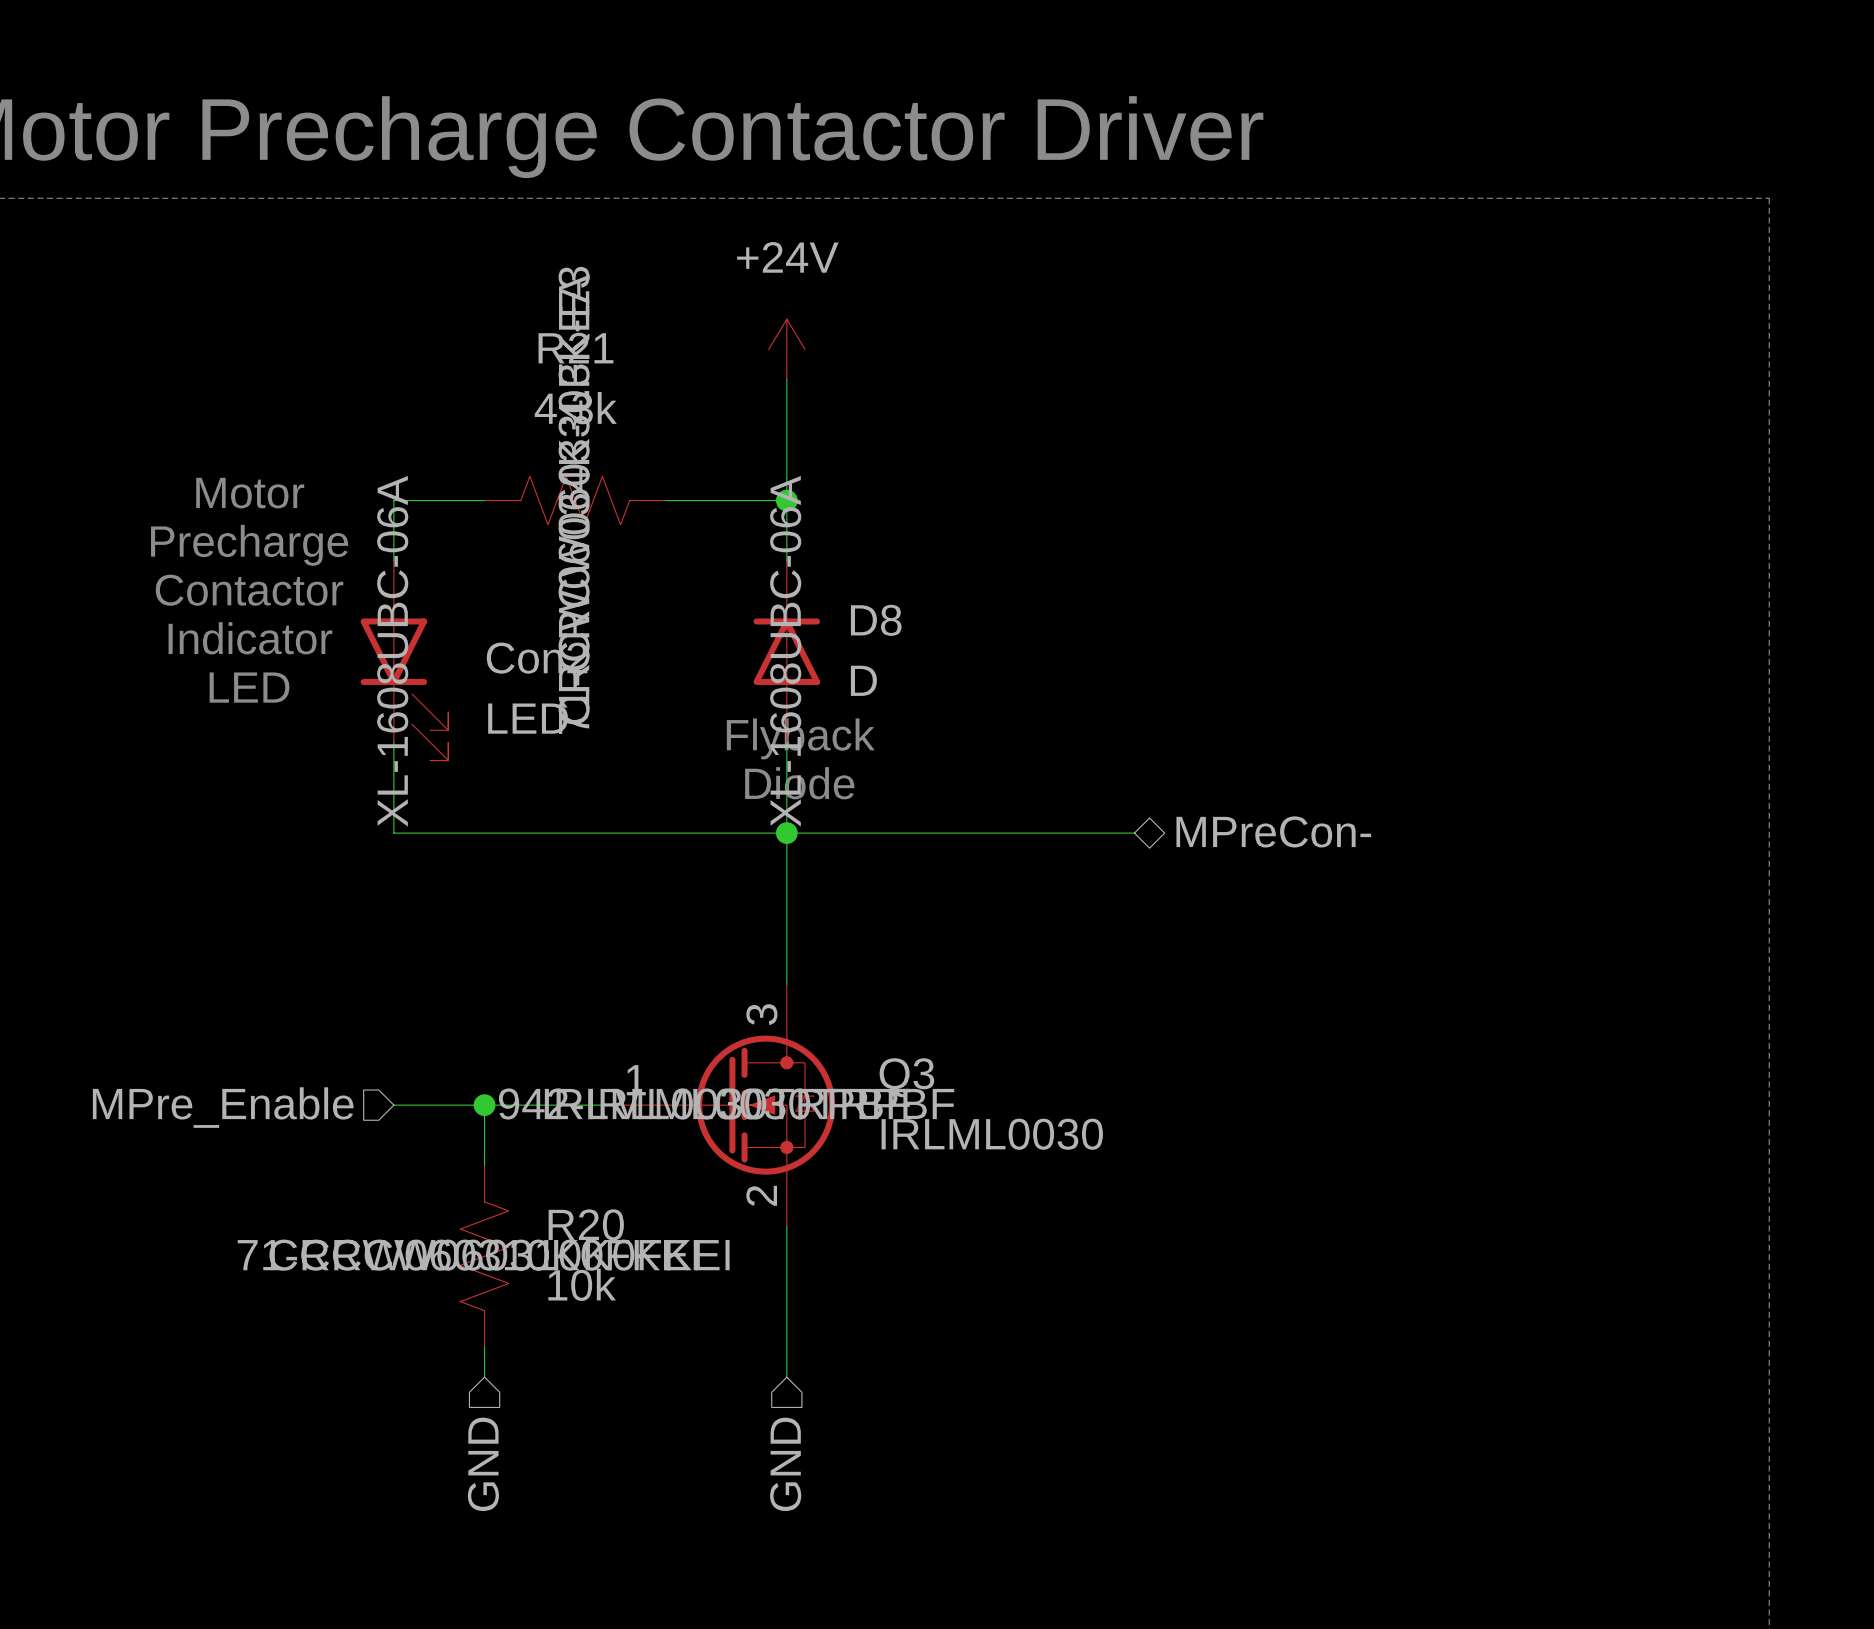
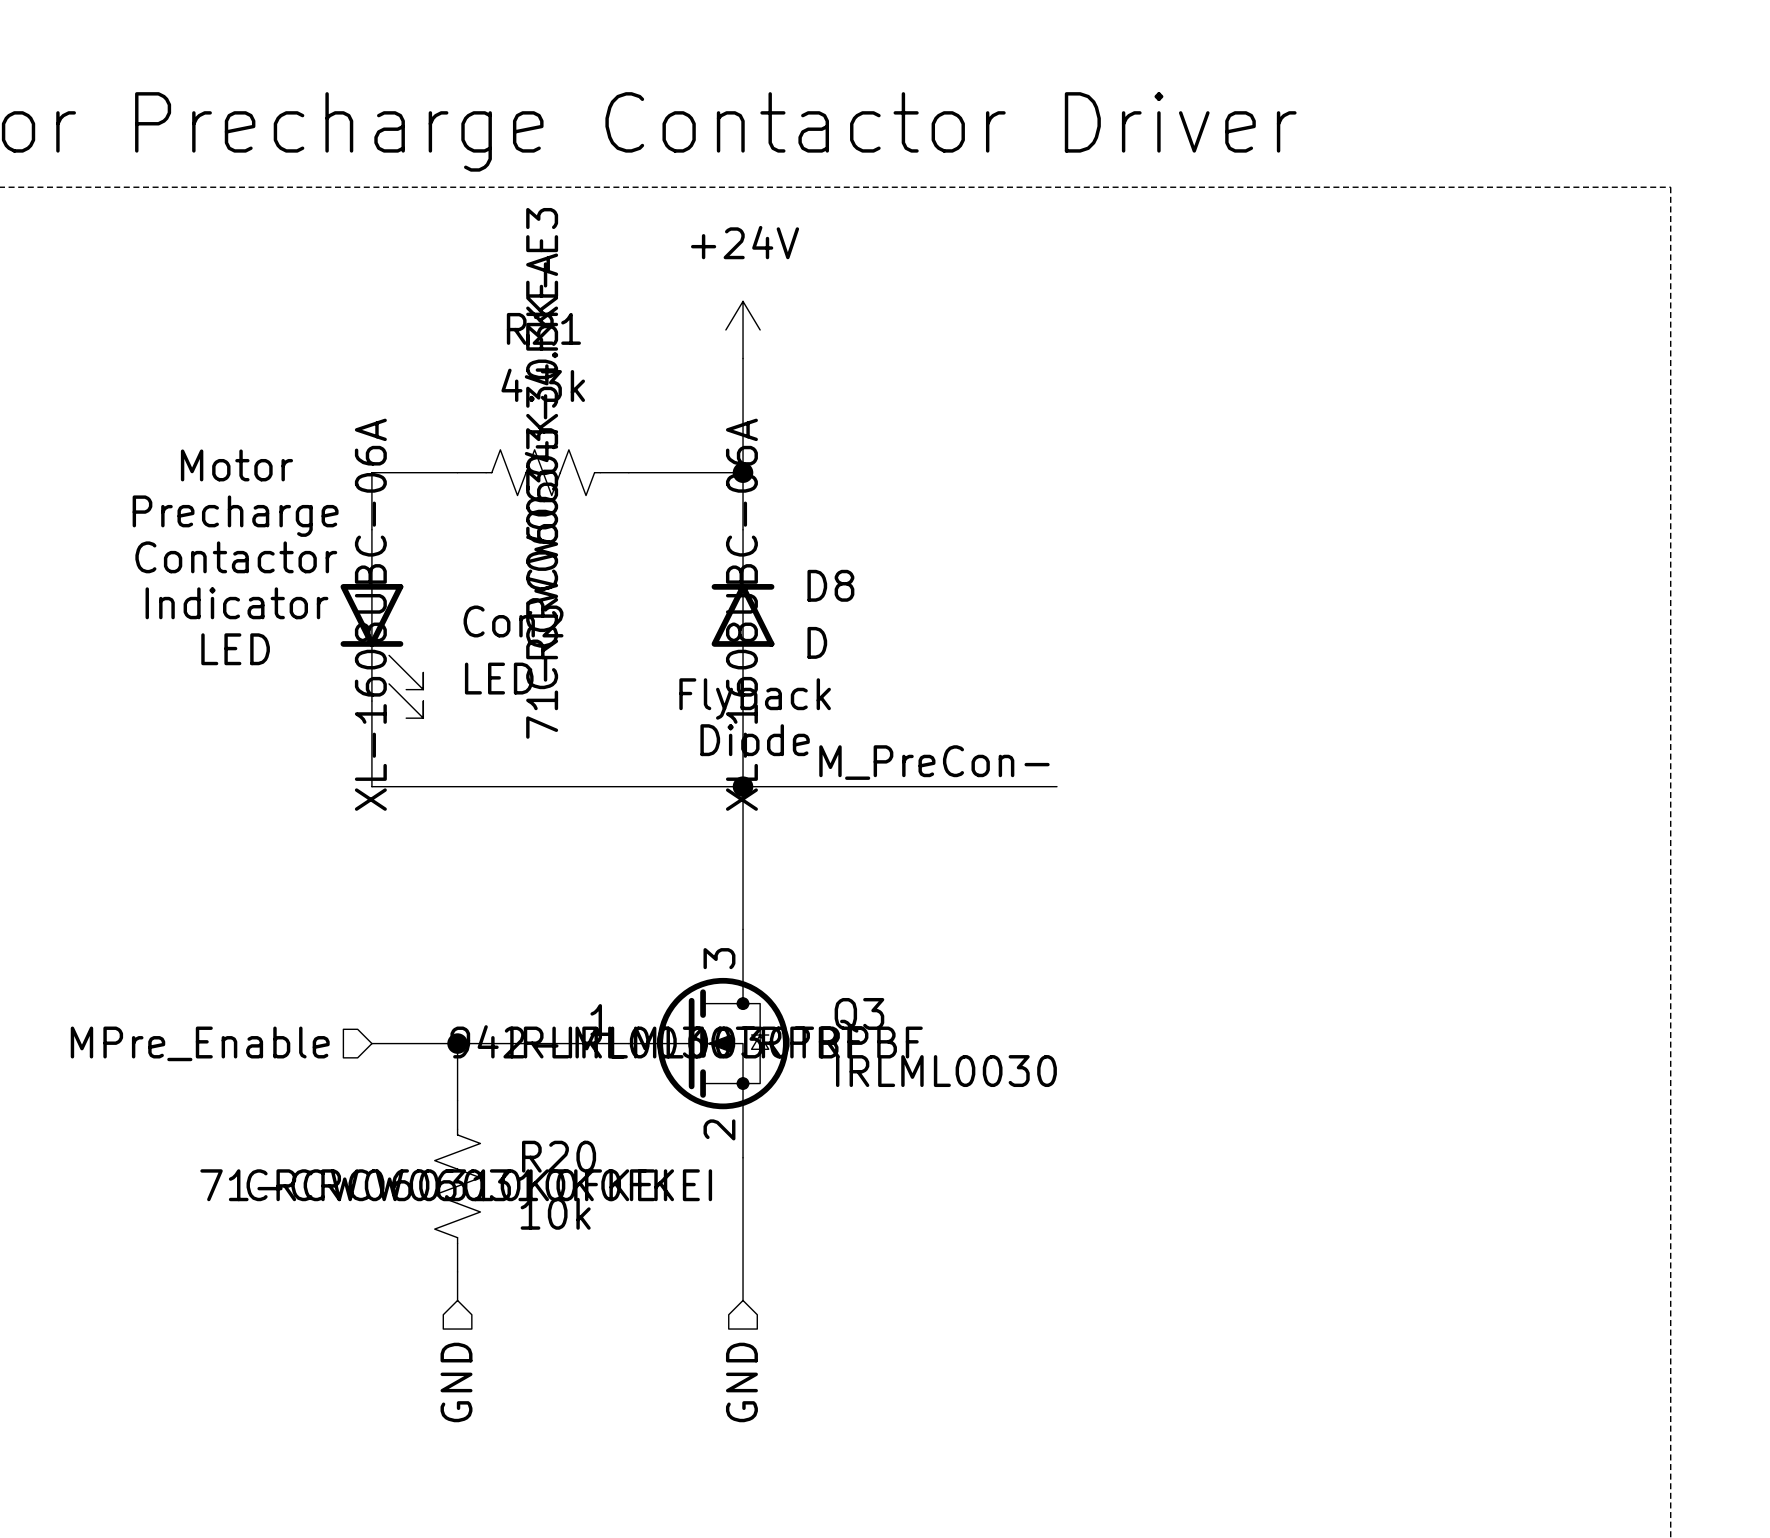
label: none -> M_PreCon- (934, 762)
hierarchical label: MPreCon- (1273, 831) -> none
wire: (1119, 833) (1134, 833) -> none

